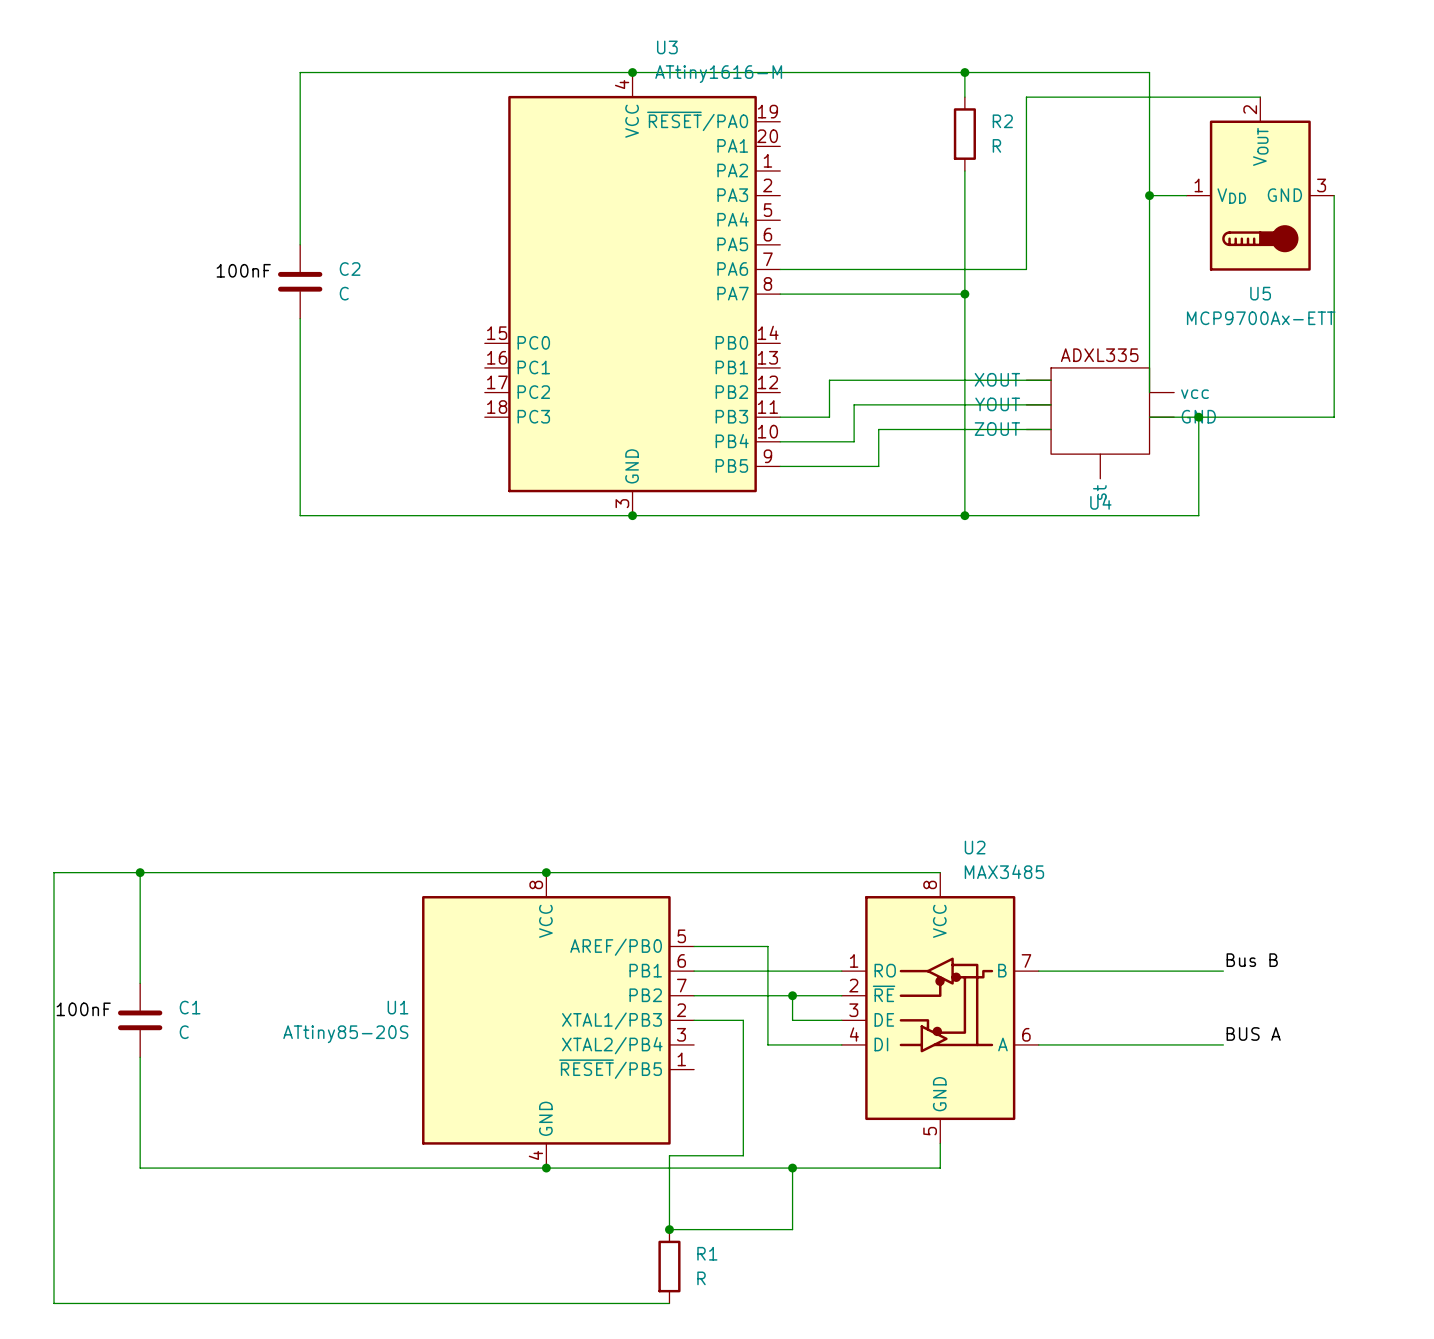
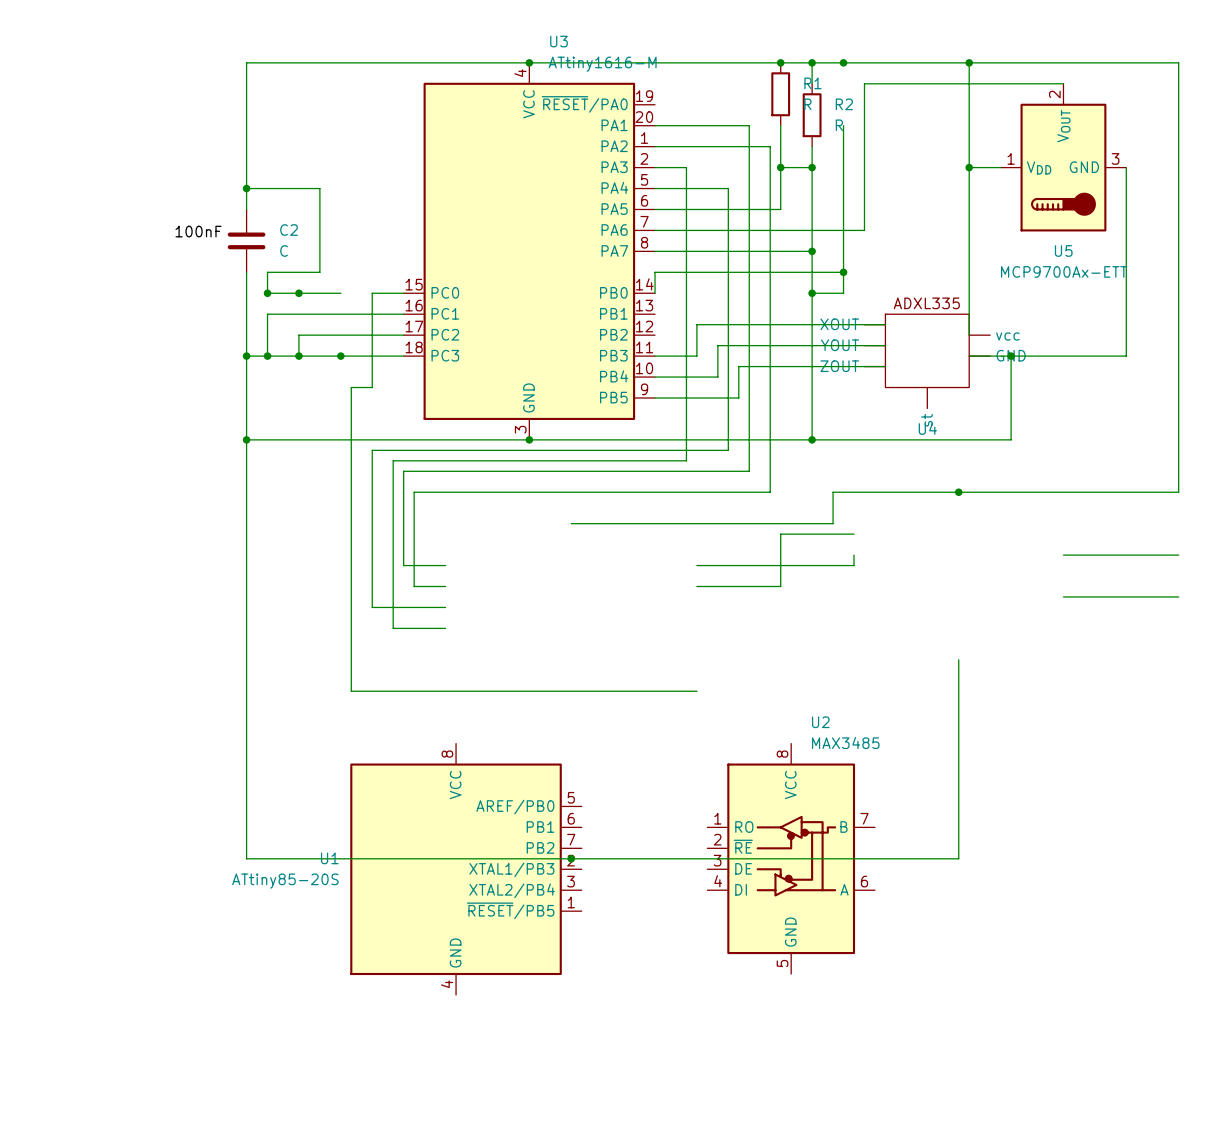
junction: none -> (780, 62)
junction: none -> (843, 62)
wire: none -> (969, 62) (1178, 62) (1178, 492) (833, 492) (833, 523) (571, 523)
junction: none -> (969, 62)
wire: none -> (655, 125) (749, 125) (749, 471) (403, 471) (403, 565) (445, 565)
wire: none -> (780, 125) (780, 209) (655, 209)
wire: none -> (843, 125) (843, 293) (812, 293)
wire: none -> (655, 146) (770, 146) (770, 492) (414, 492) (414, 586) (445, 586)
wire: none -> (655, 167) (686, 167) (686, 460) (393, 460) (393, 628) (445, 628)
wire: none -> (780, 167) (812, 167)
junction: none -> (780, 167)
junction: none -> (812, 167)
wire: none -> (246, 188) (319, 188) (319, 272) (267, 272) (267, 293) (340, 293)
junction: none -> (246, 188)
wire: none -> (655, 188) (728, 188) (728, 450) (372, 450) (372, 607) (445, 607)
wire: none -> (843, 272) (655, 272) (655, 293)
junction: none -> (843, 272)
junction: none -> (267, 293)
junction: none -> (298, 293)
wire: none -> (403, 293) (372, 293) (372, 387) (351, 387) (351, 691) (696, 691)
junction: none -> (812, 293)
wire: none -> (403, 314) (267, 314) (267, 356)
wire: none -> (403, 335) (298, 335) (298, 356)
wire: none -> (246, 356) (403, 356)
junction: none -> (246, 356)
junction: none -> (267, 356)
junction: none -> (298, 356)
junction: none -> (340, 356)
wire: none -> (246, 439) (246, 858) (958, 858) (958, 659)
junction: none -> (246, 439)
junction: none -> (958, 492)
wire: none -> (854, 534) (780, 534) (780, 586) (696, 586)
wire: none -> (854, 555) (854, 565) (696, 565)
wire: none -> (1063, 555) (1178, 555)
wire: none -> (1063, 596) (1178, 596)
wire: (140, 872) (140, 983) -> none
junction: (140, 872) -> none
junction: (546, 872) -> none
wire: (940, 872) (54, 872) (54, 1303) (669, 1303) -> none
wire: (694, 946) (767, 946) (767, 1044) (841, 1044) -> none
label: Bus B (1252, 960) -> none
wire: (694, 971) (841, 971) -> none
wire: (1038, 971) (1223, 971) -> none
wire: (694, 995) (841, 995) -> none
wire: (792, 995) (792, 1020) (841, 1020) -> none
junction: (792, 995) -> none
junction: none -> (571, 858)
label: 100nF (83, 1009) -> none
C1: C (140, 1020) -> none
wire: (694, 1020) (743, 1020) (743, 1155) (669, 1155) (669, 1229) (792, 1229) (792, 1168) -> none
label: BUS A (1253, 1033) -> none
wire: (1038, 1044) (1223, 1044) -> none
wire: (140, 1057) (140, 1168) (940, 1168) (940, 1143) -> none
junction: (546, 1168) -> none
junction: (792, 1168) -> none
junction: (669, 1229) -> none
R1 position: (669, 1266) -> (780, 94)

